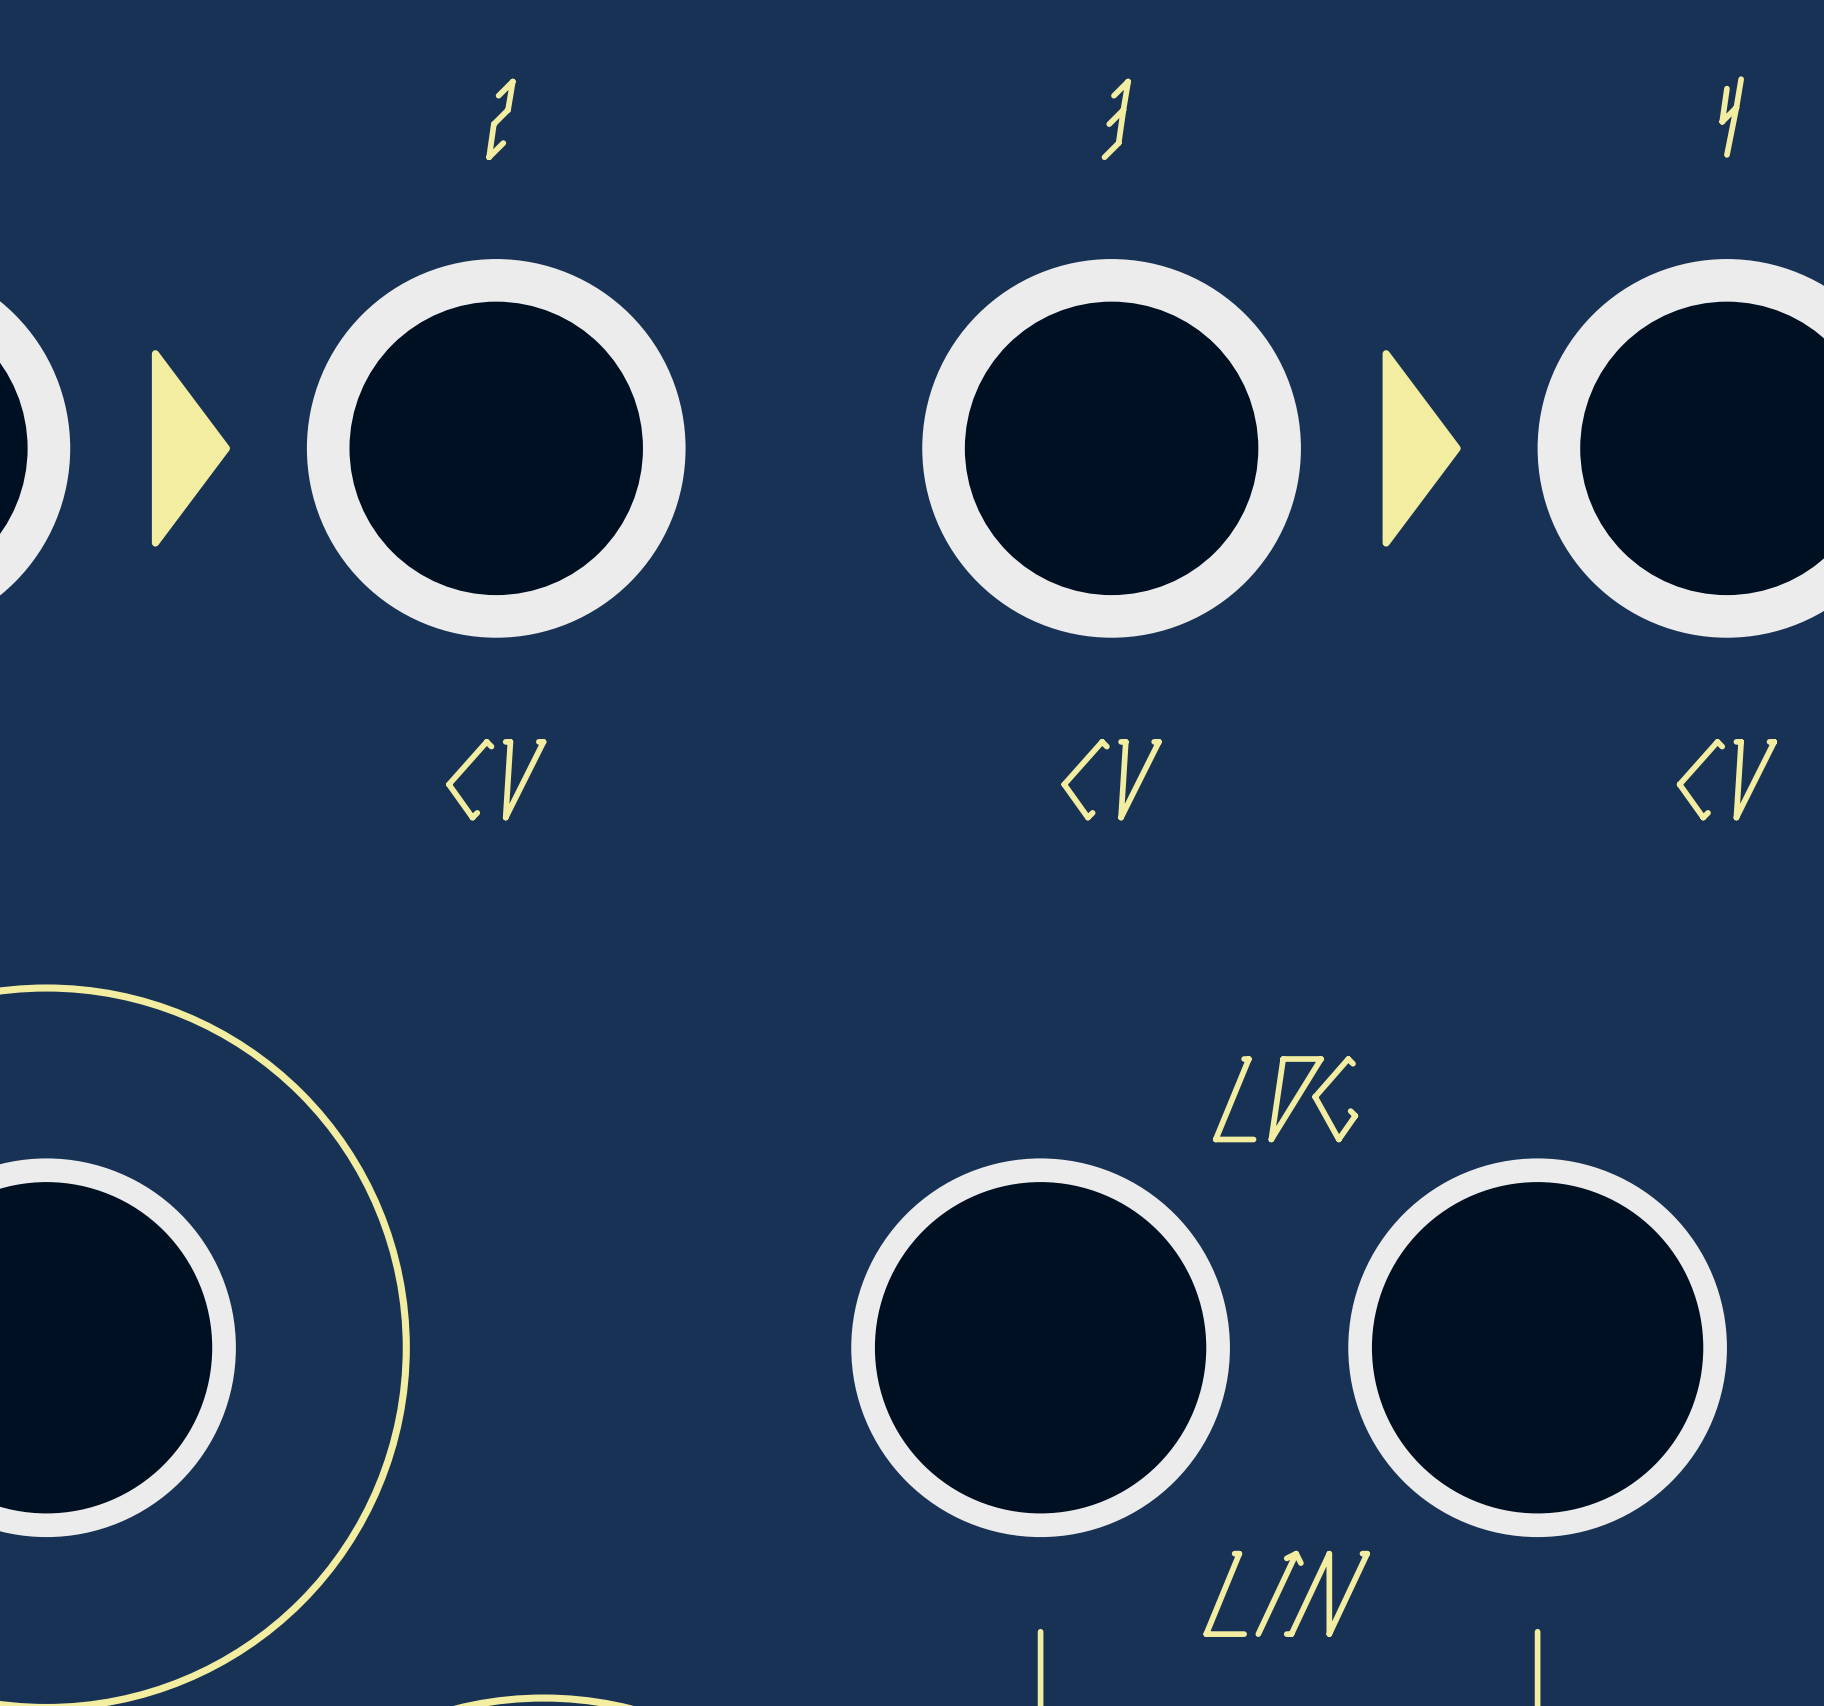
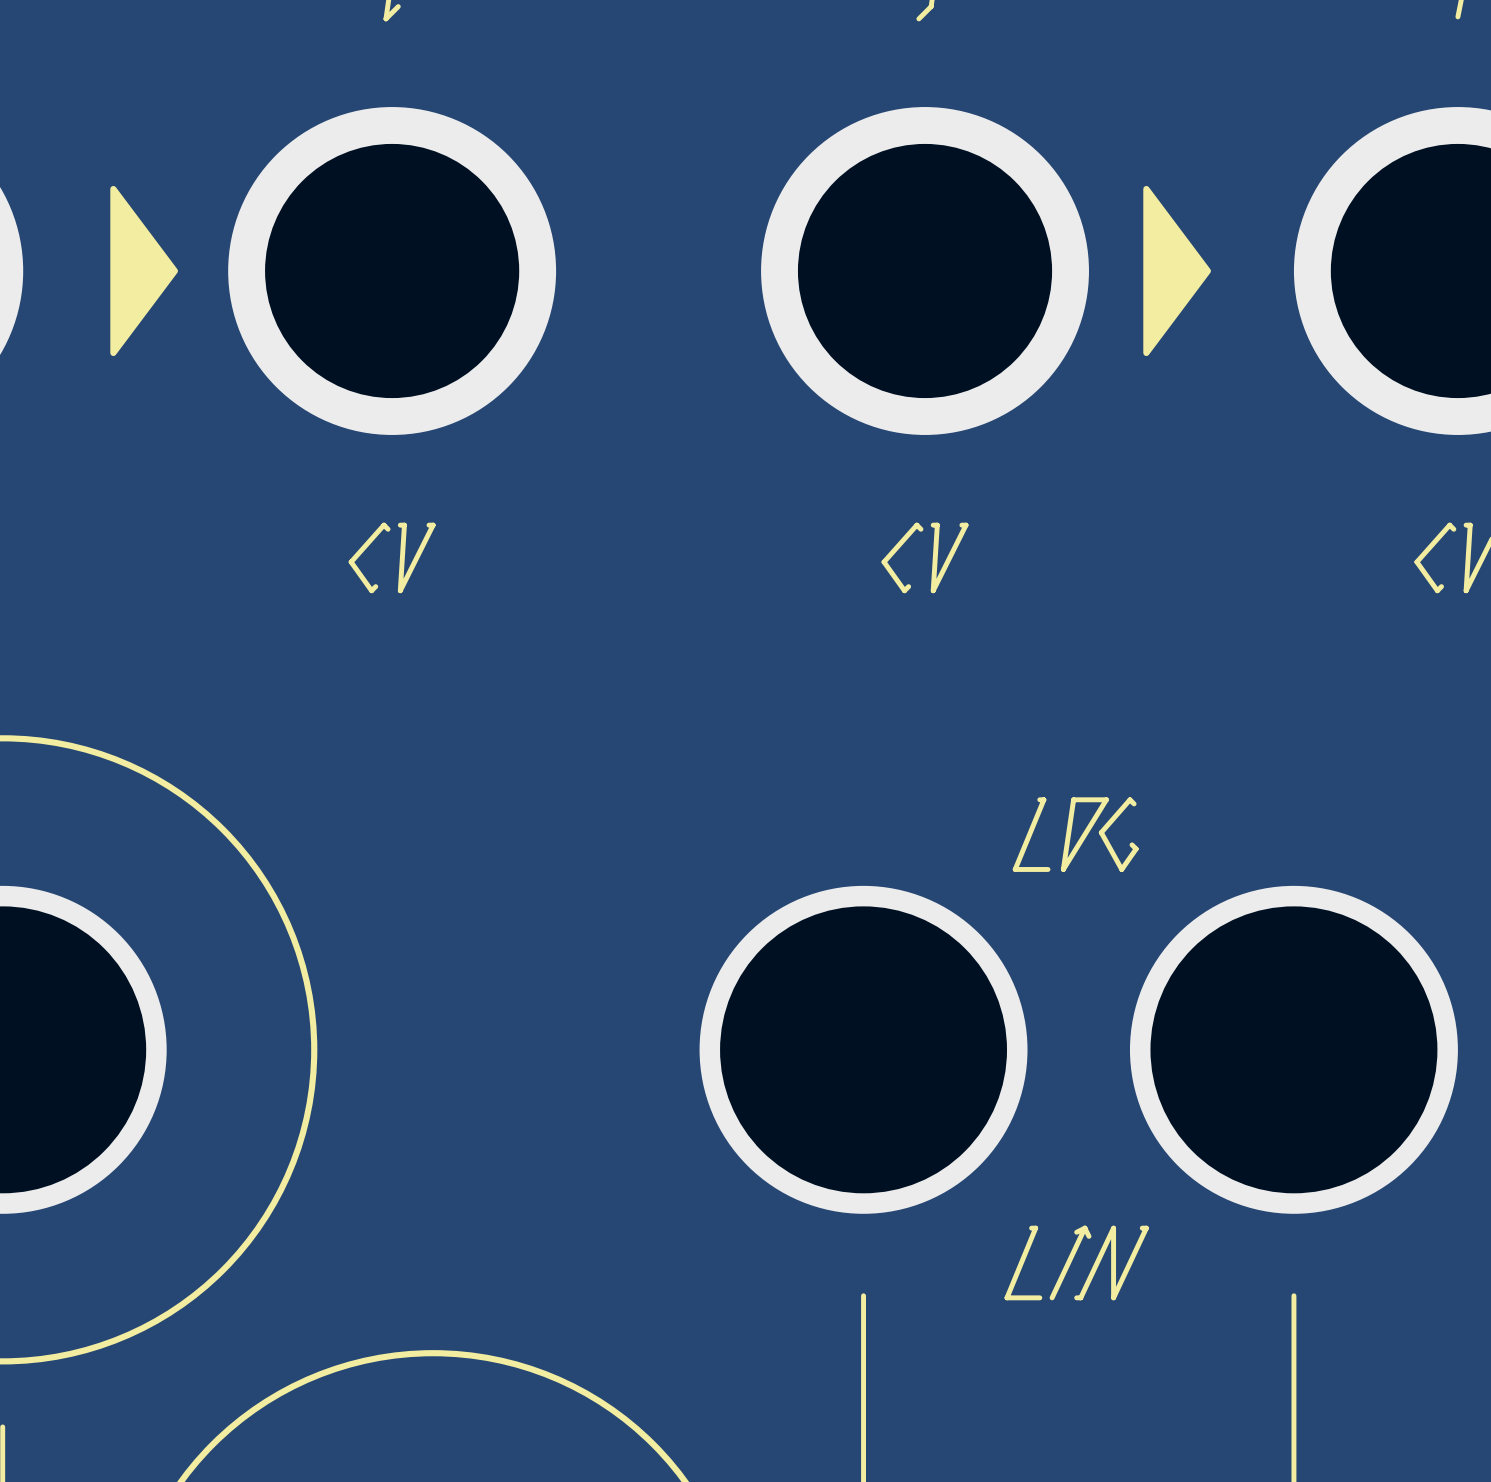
drawing position: (190, 448) -> (144, 271)
drawing position: (1421, 448) -> (1177, 271)

